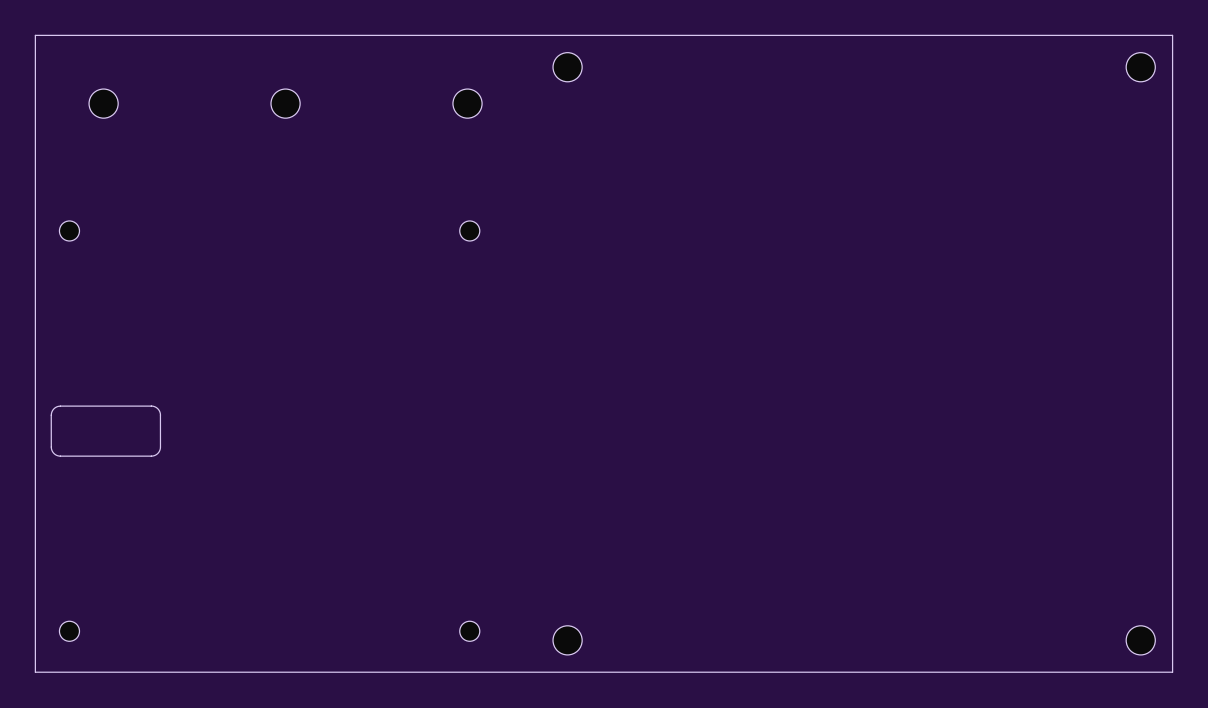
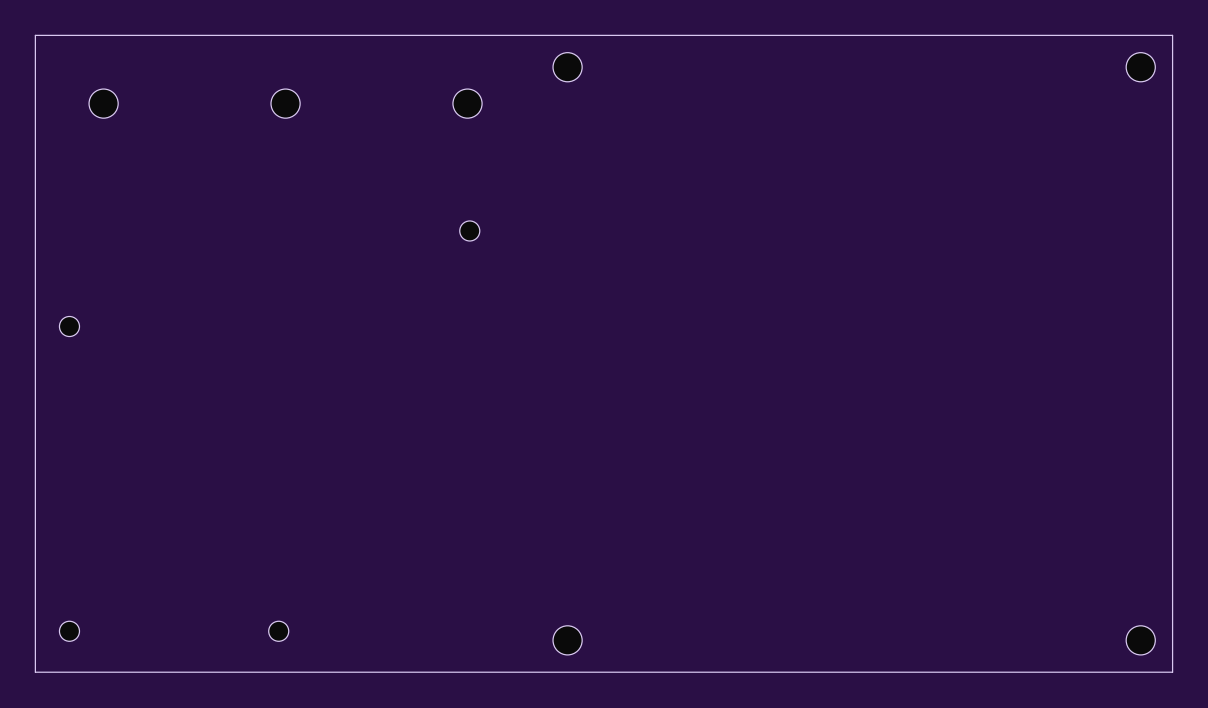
part position: (69, 230) -> (69, 326)
board edge: (151, 406) (56, 406) (51, 414) (52, 450) (60, 456) (154, 455) (160, 448) (160, 414) (156, 407) (151, 406) -> none
part position: (469, 631) -> (278, 631)

